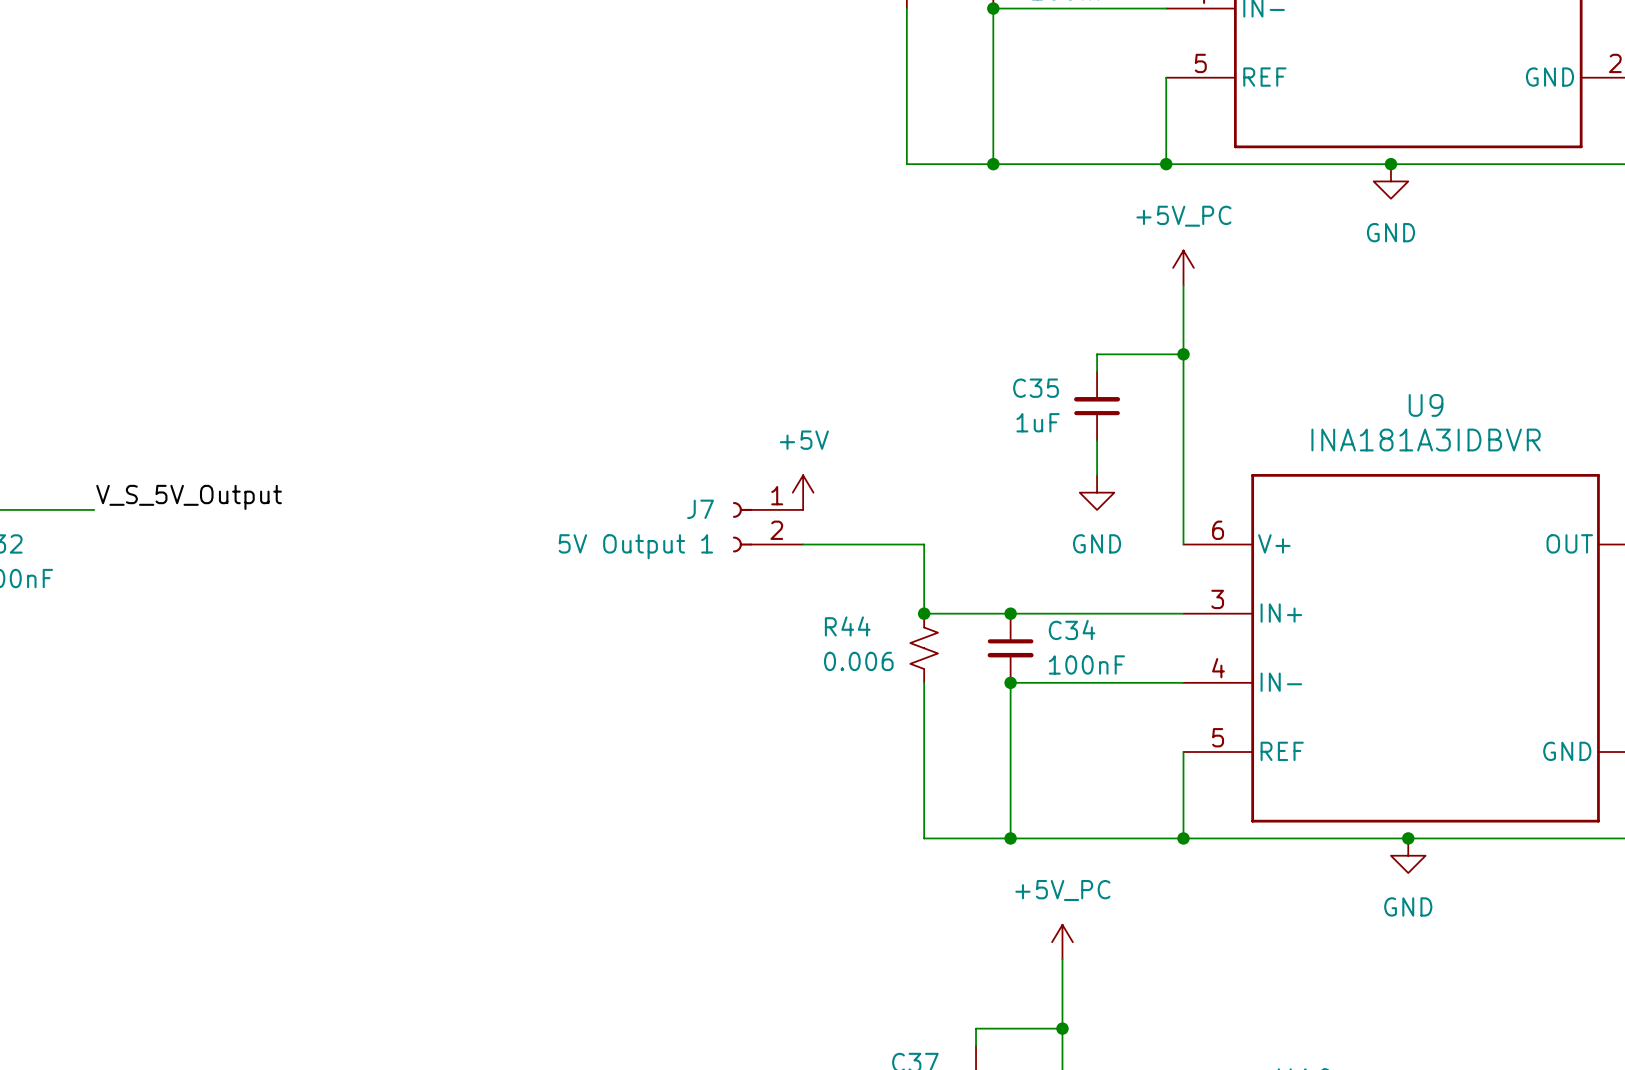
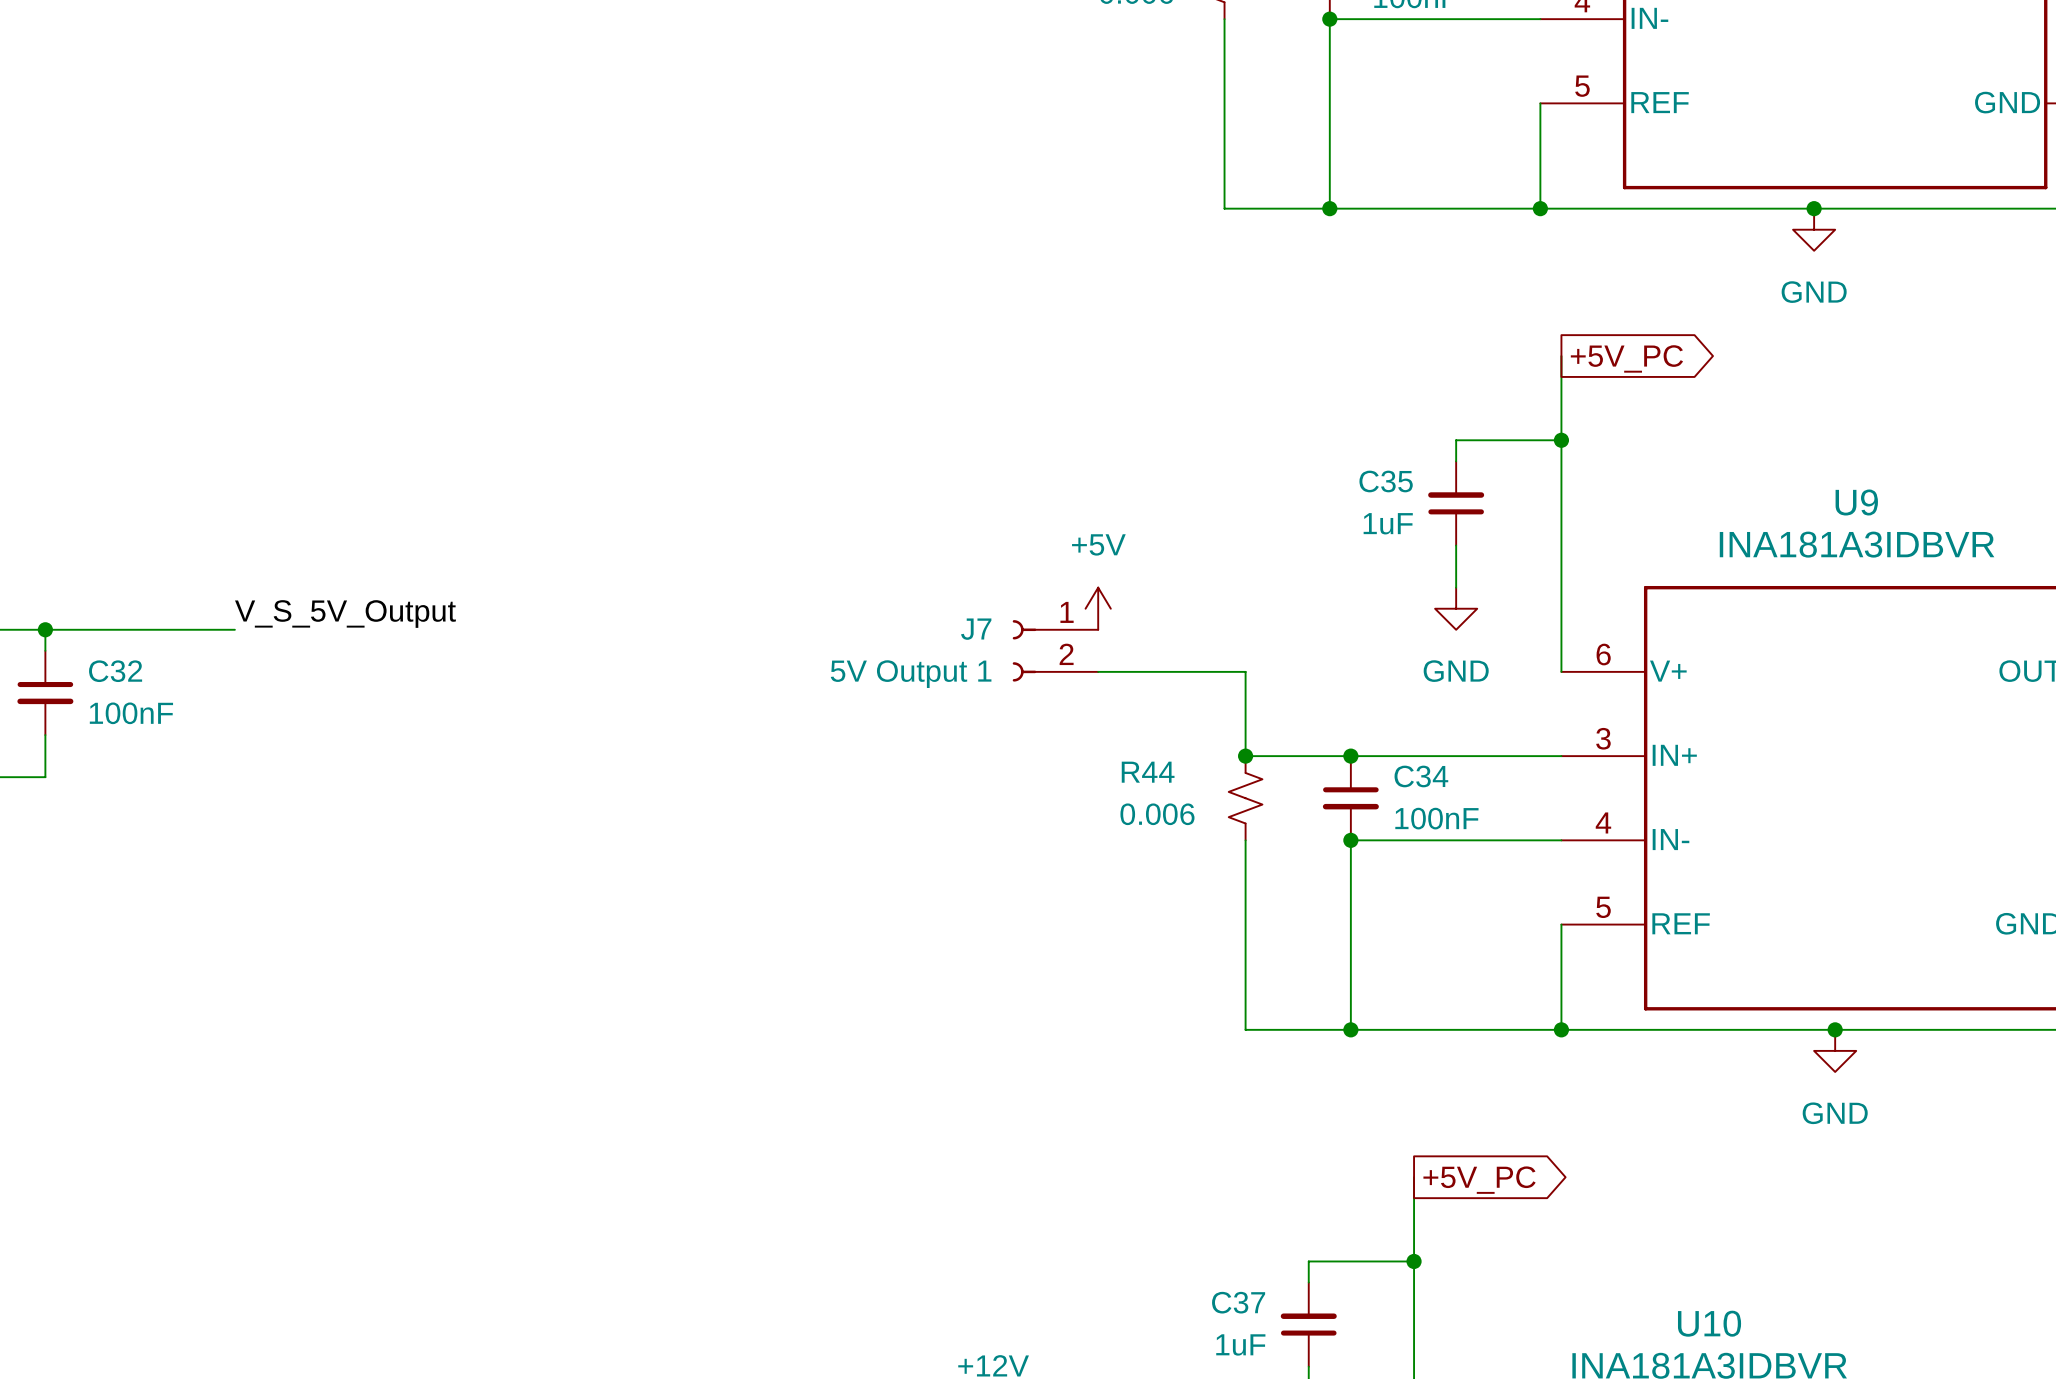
power symbol: +5V_PC (1183, 267) -> none
global label: none -> +5V_PC (1626, 358)
power symbol: +5V_PC (1062, 942) -> none
global label: none -> +5V_PC (1479, 1180)

